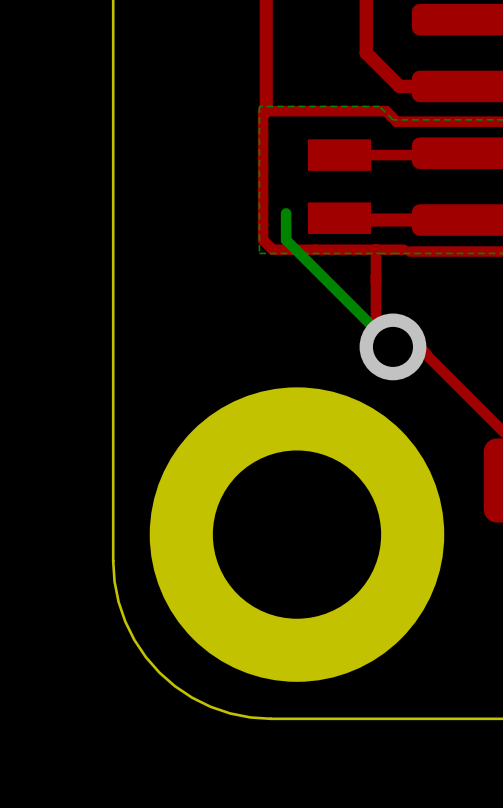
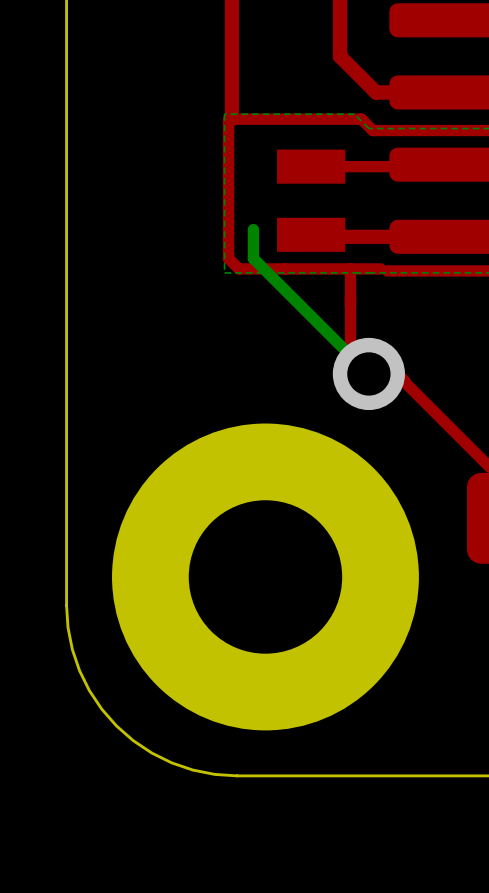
part footprint: [149, 387, 445, 682] -> [112, 423, 419, 731]

